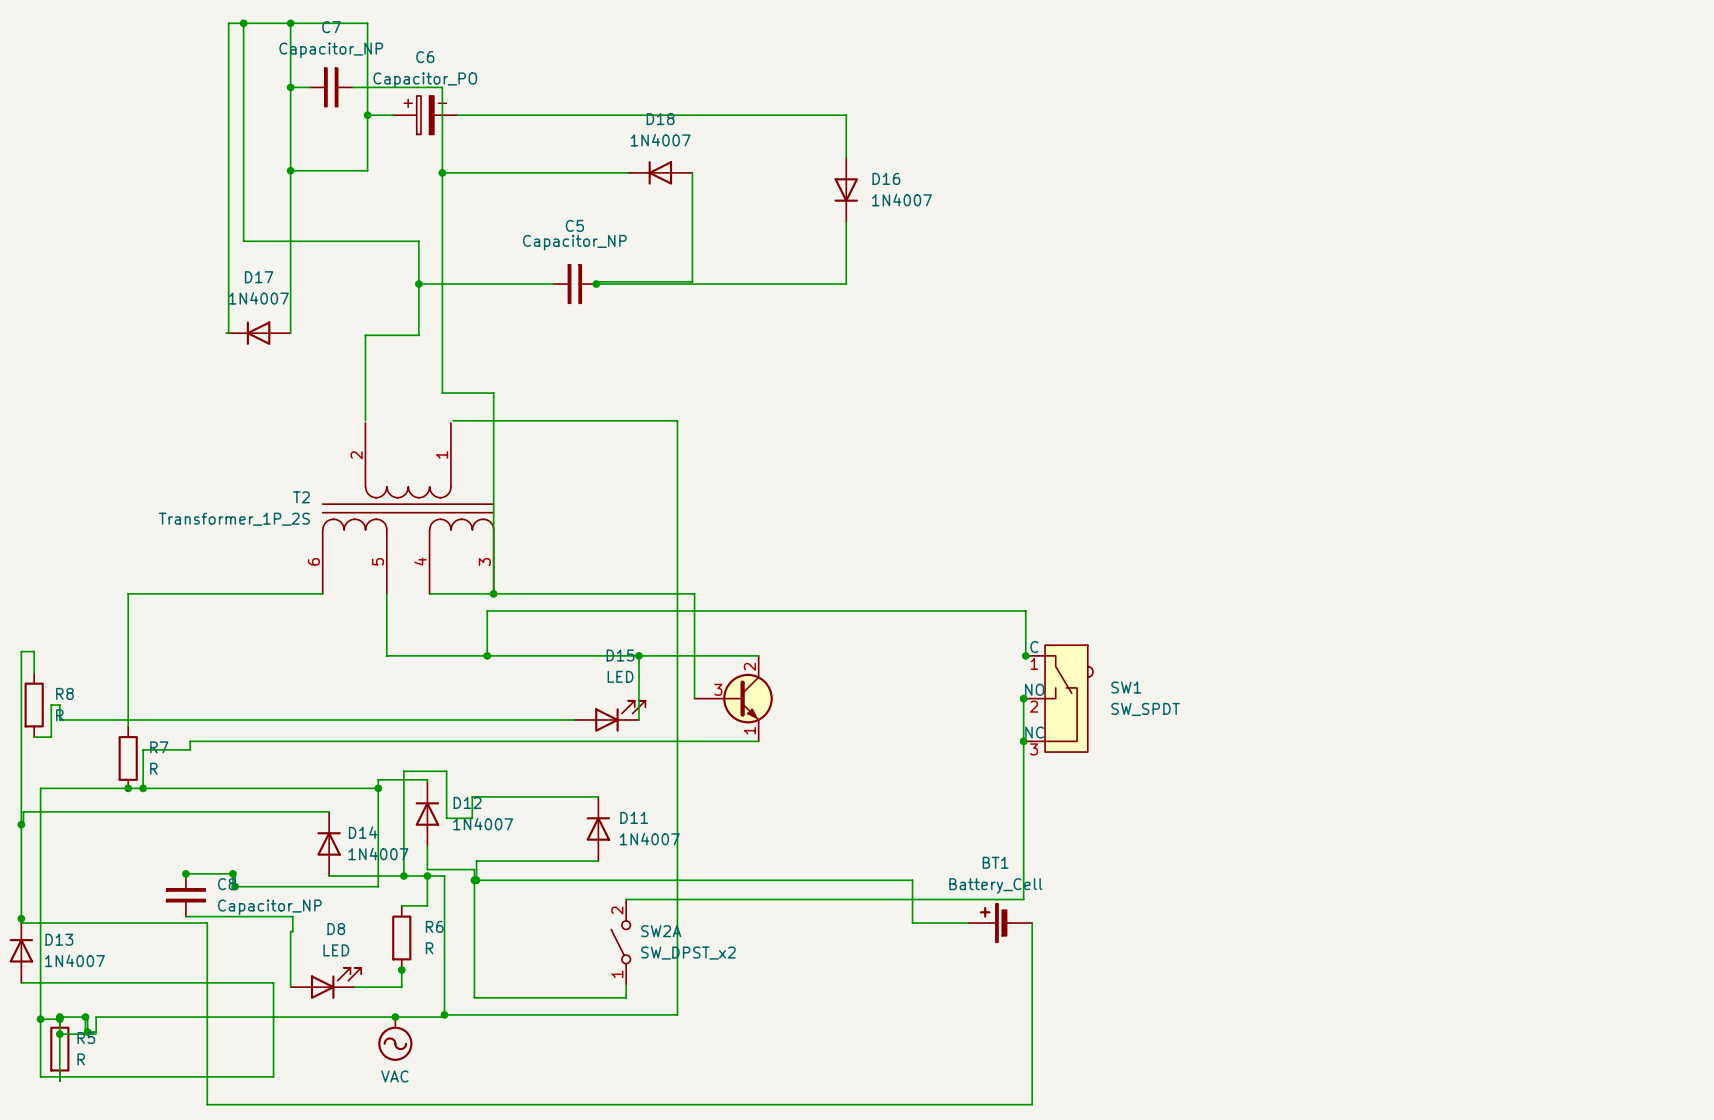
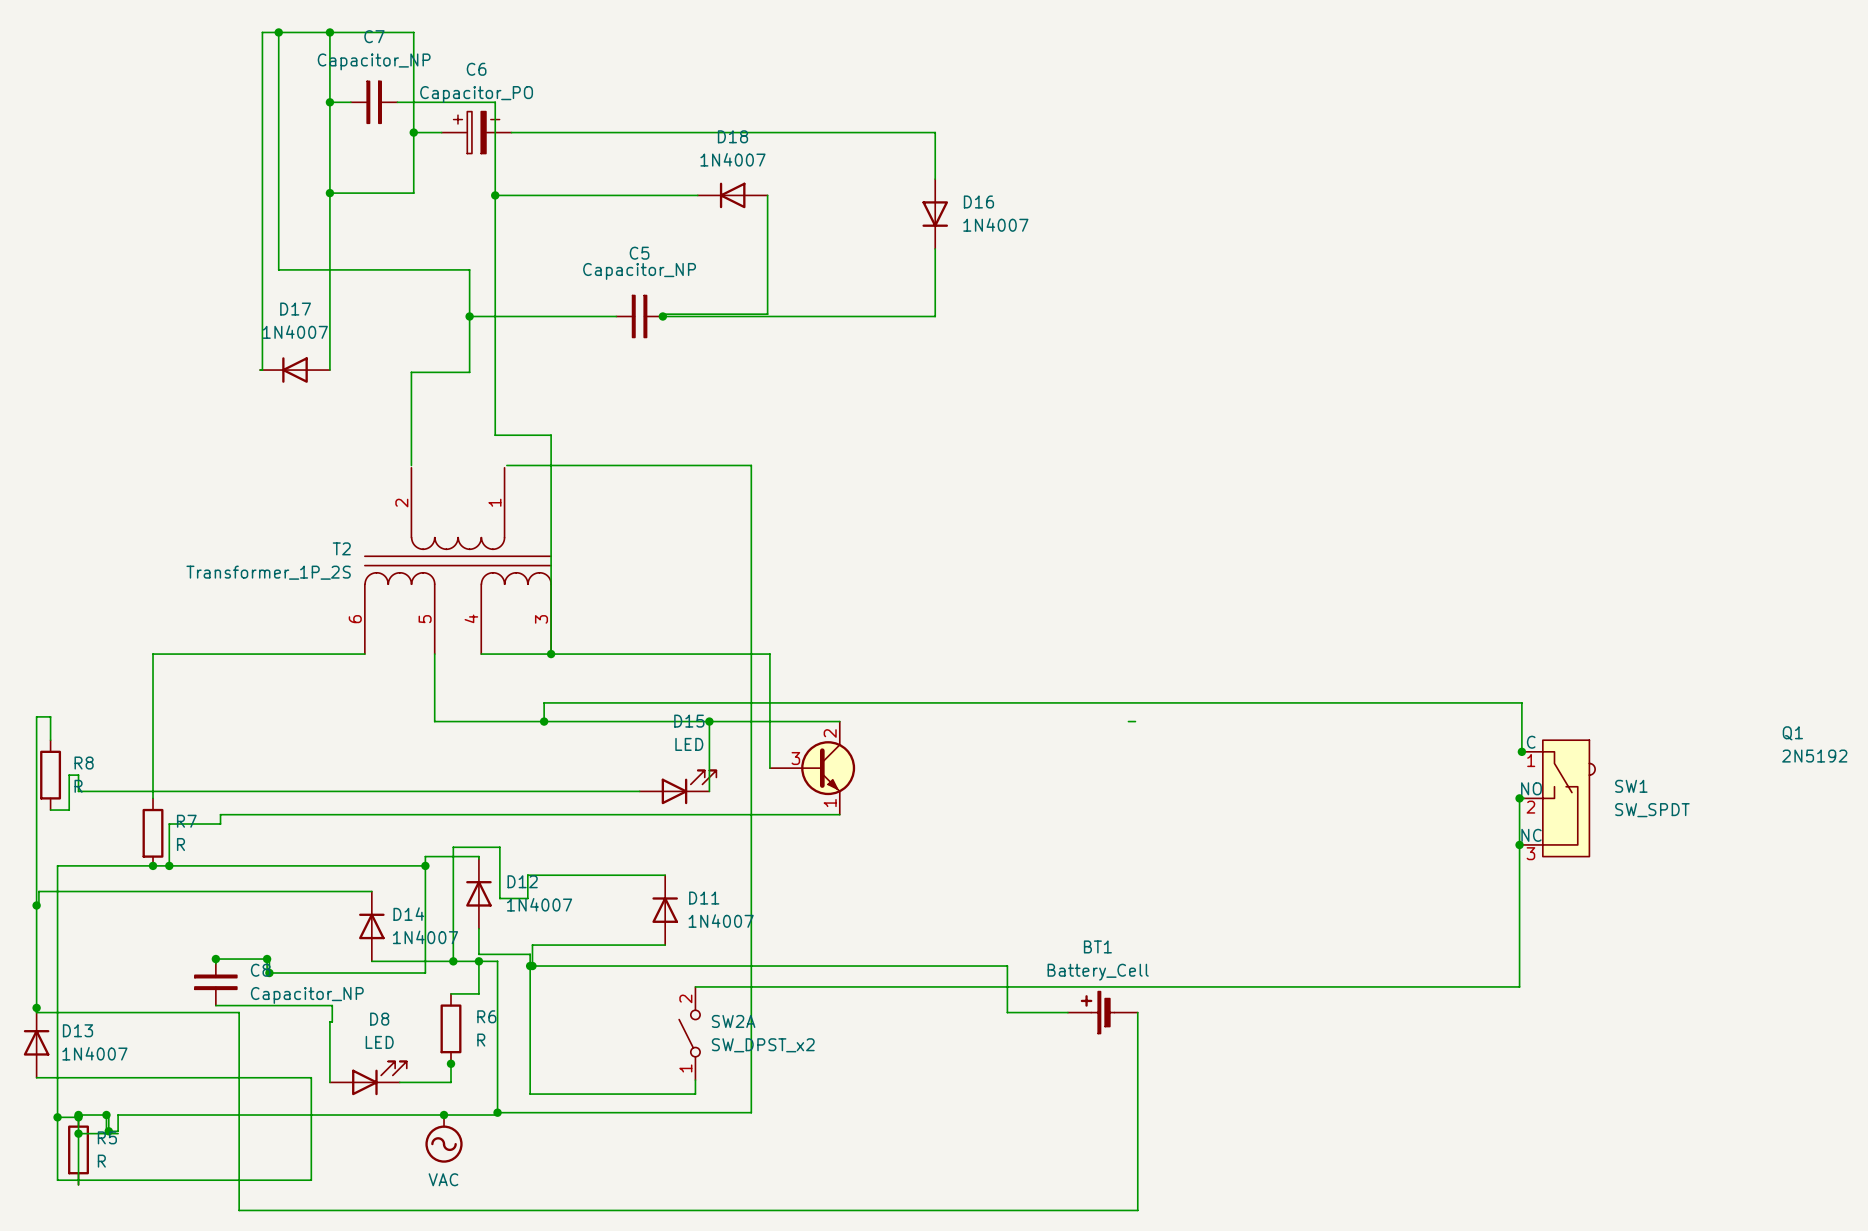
wire: (487, 638) (487, 611) (1025, 611) (1025, 655) -> (544, 702) (1521, 702) (1521, 751)
junction: (1025, 655) -> none
Q1 name: none -> Q1 (1792, 733)
junction: none -> (1521, 751)
Q1 value: none -> 2N5192 (1814, 756)
junction: (1023, 698) -> none
wire: (1027, 698) (1023, 698) (1023, 899) -> (1524, 798) (1519, 798) (1519, 986) (1128, 986)
SW1 position: (1058, 698) -> (1557, 798)
junction: none -> (1519, 798)
junction: (1023, 741) -> none
junction: none -> (1519, 844)

